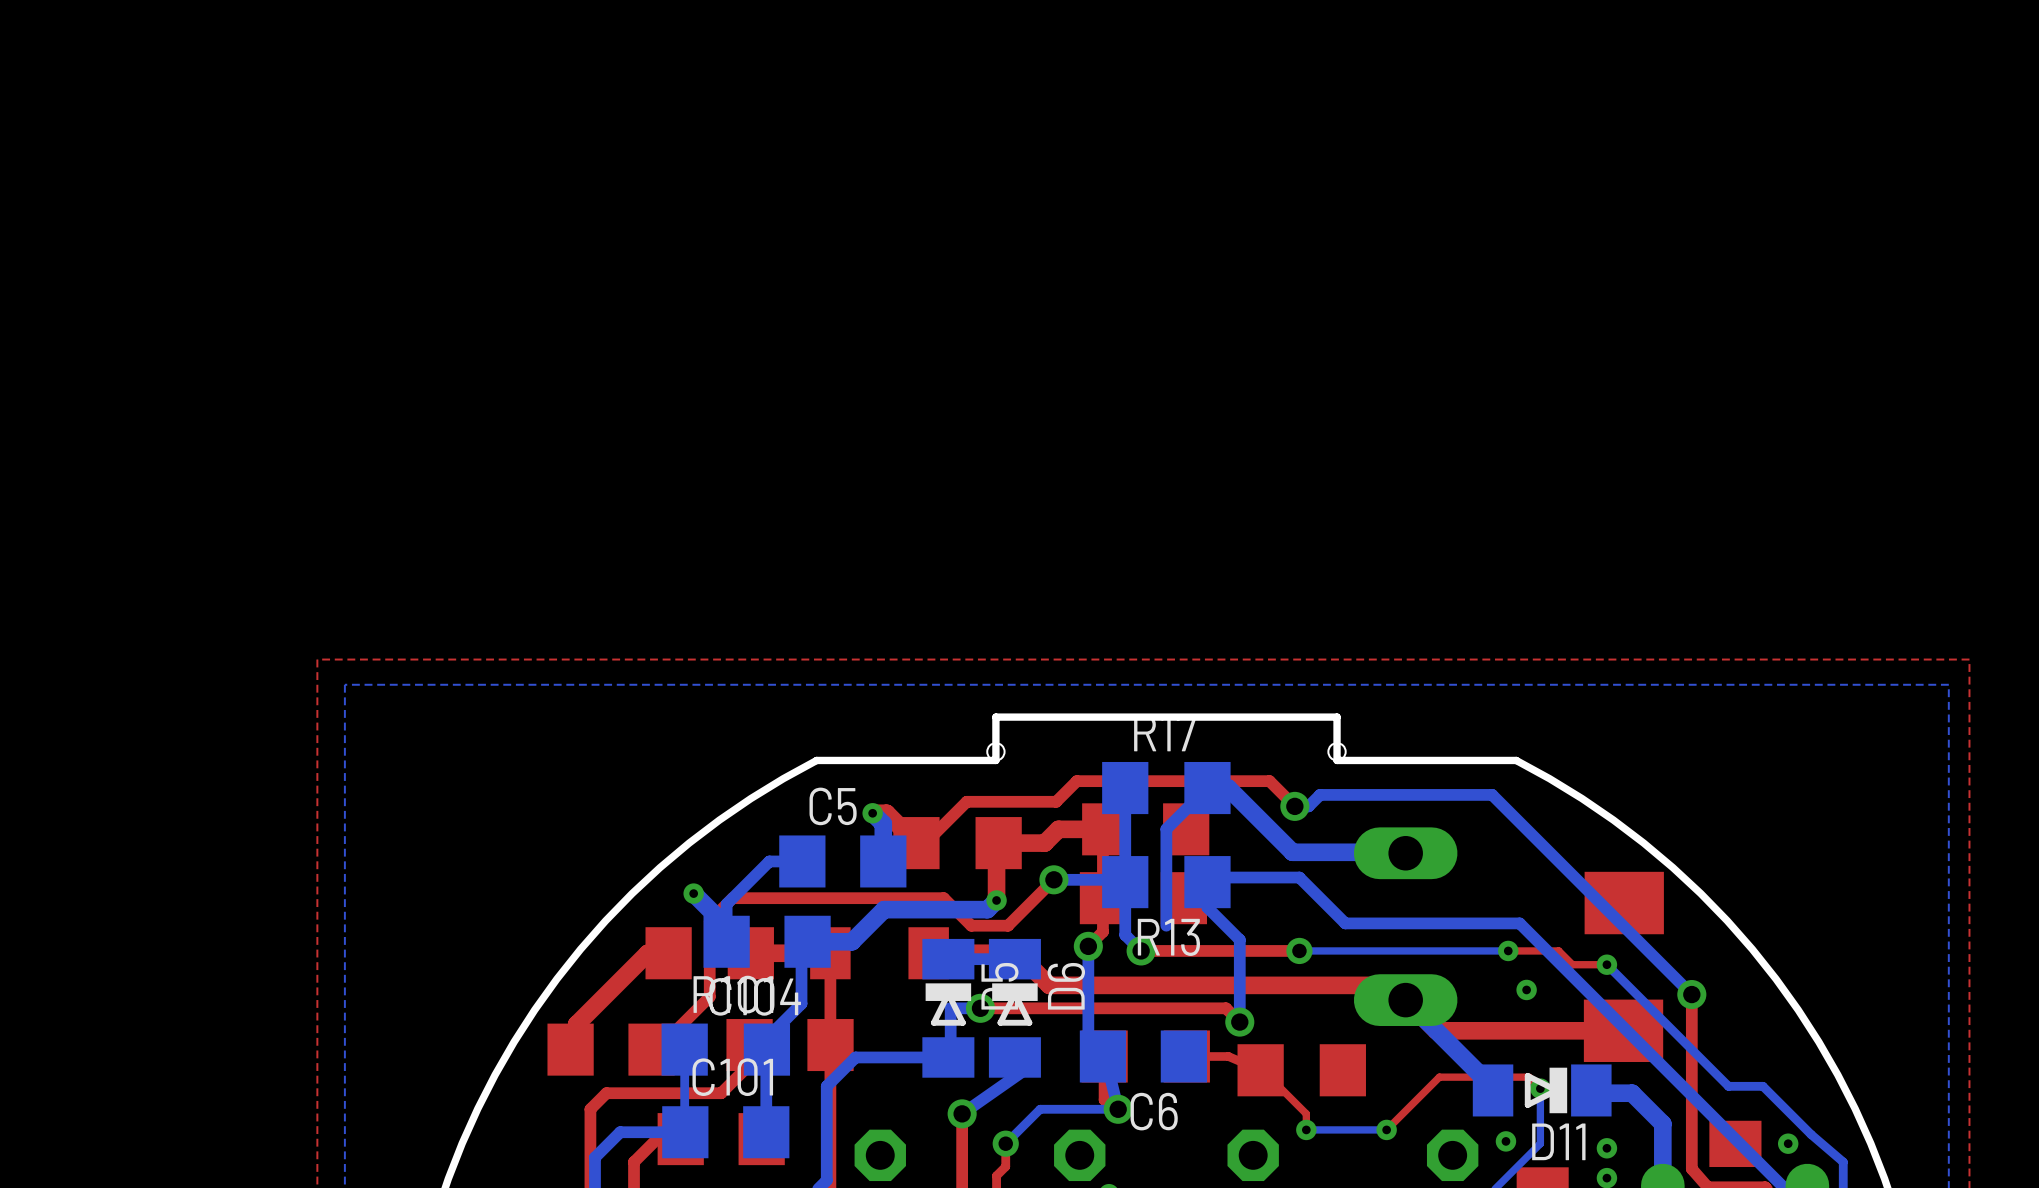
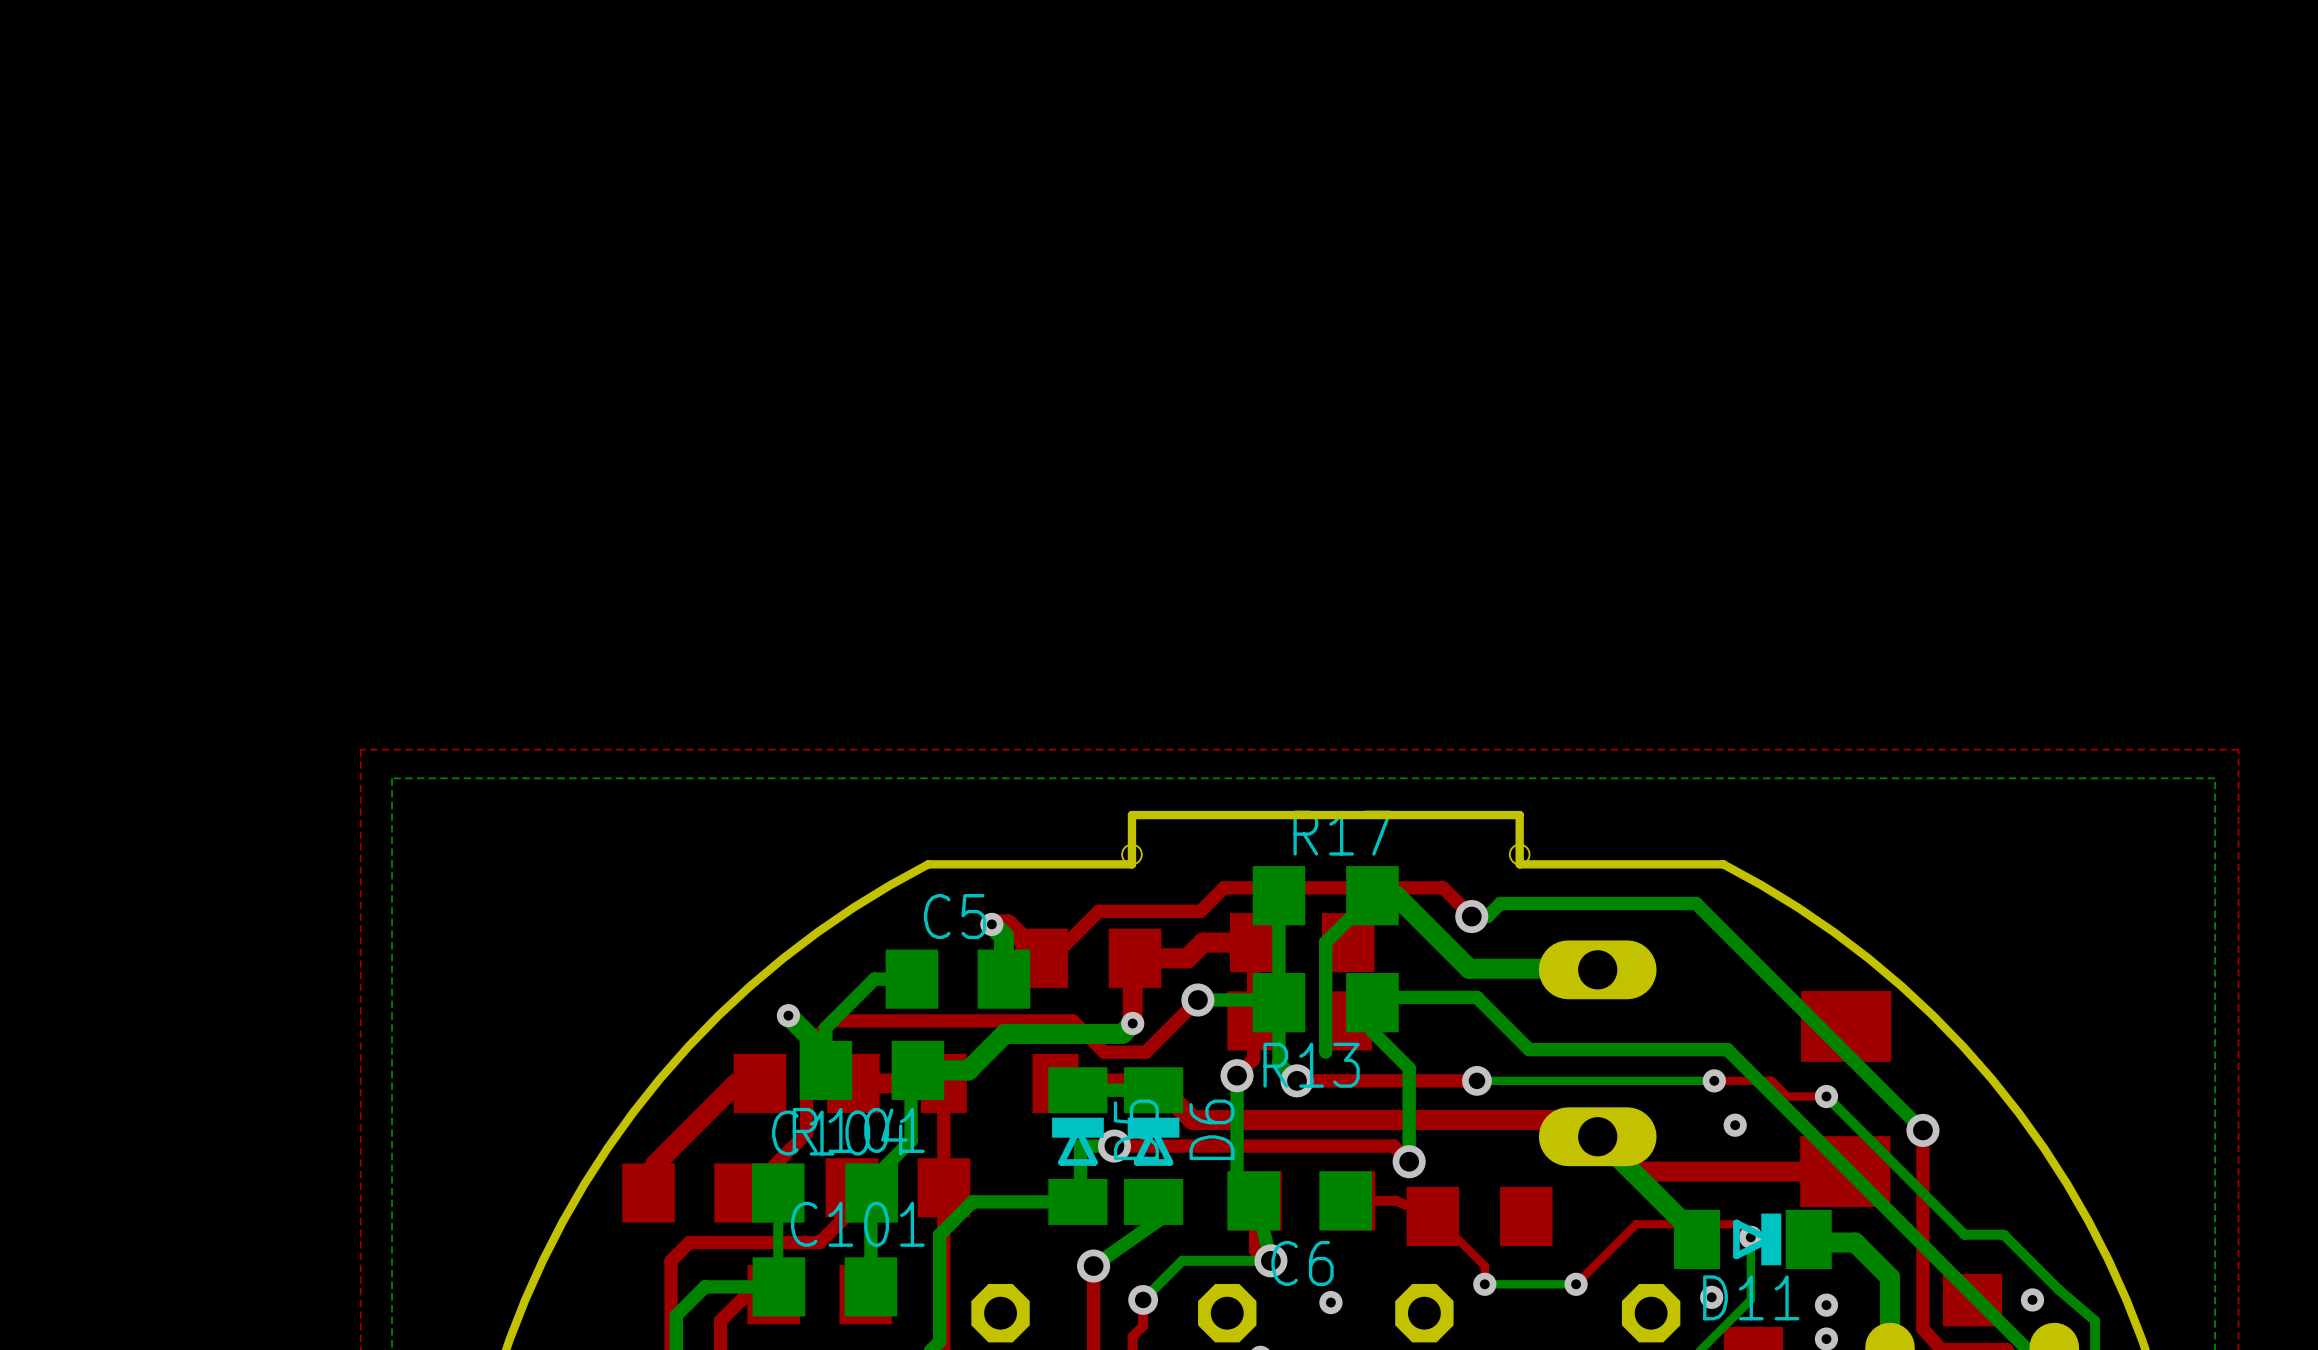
via: none -> (1330, 1302)

